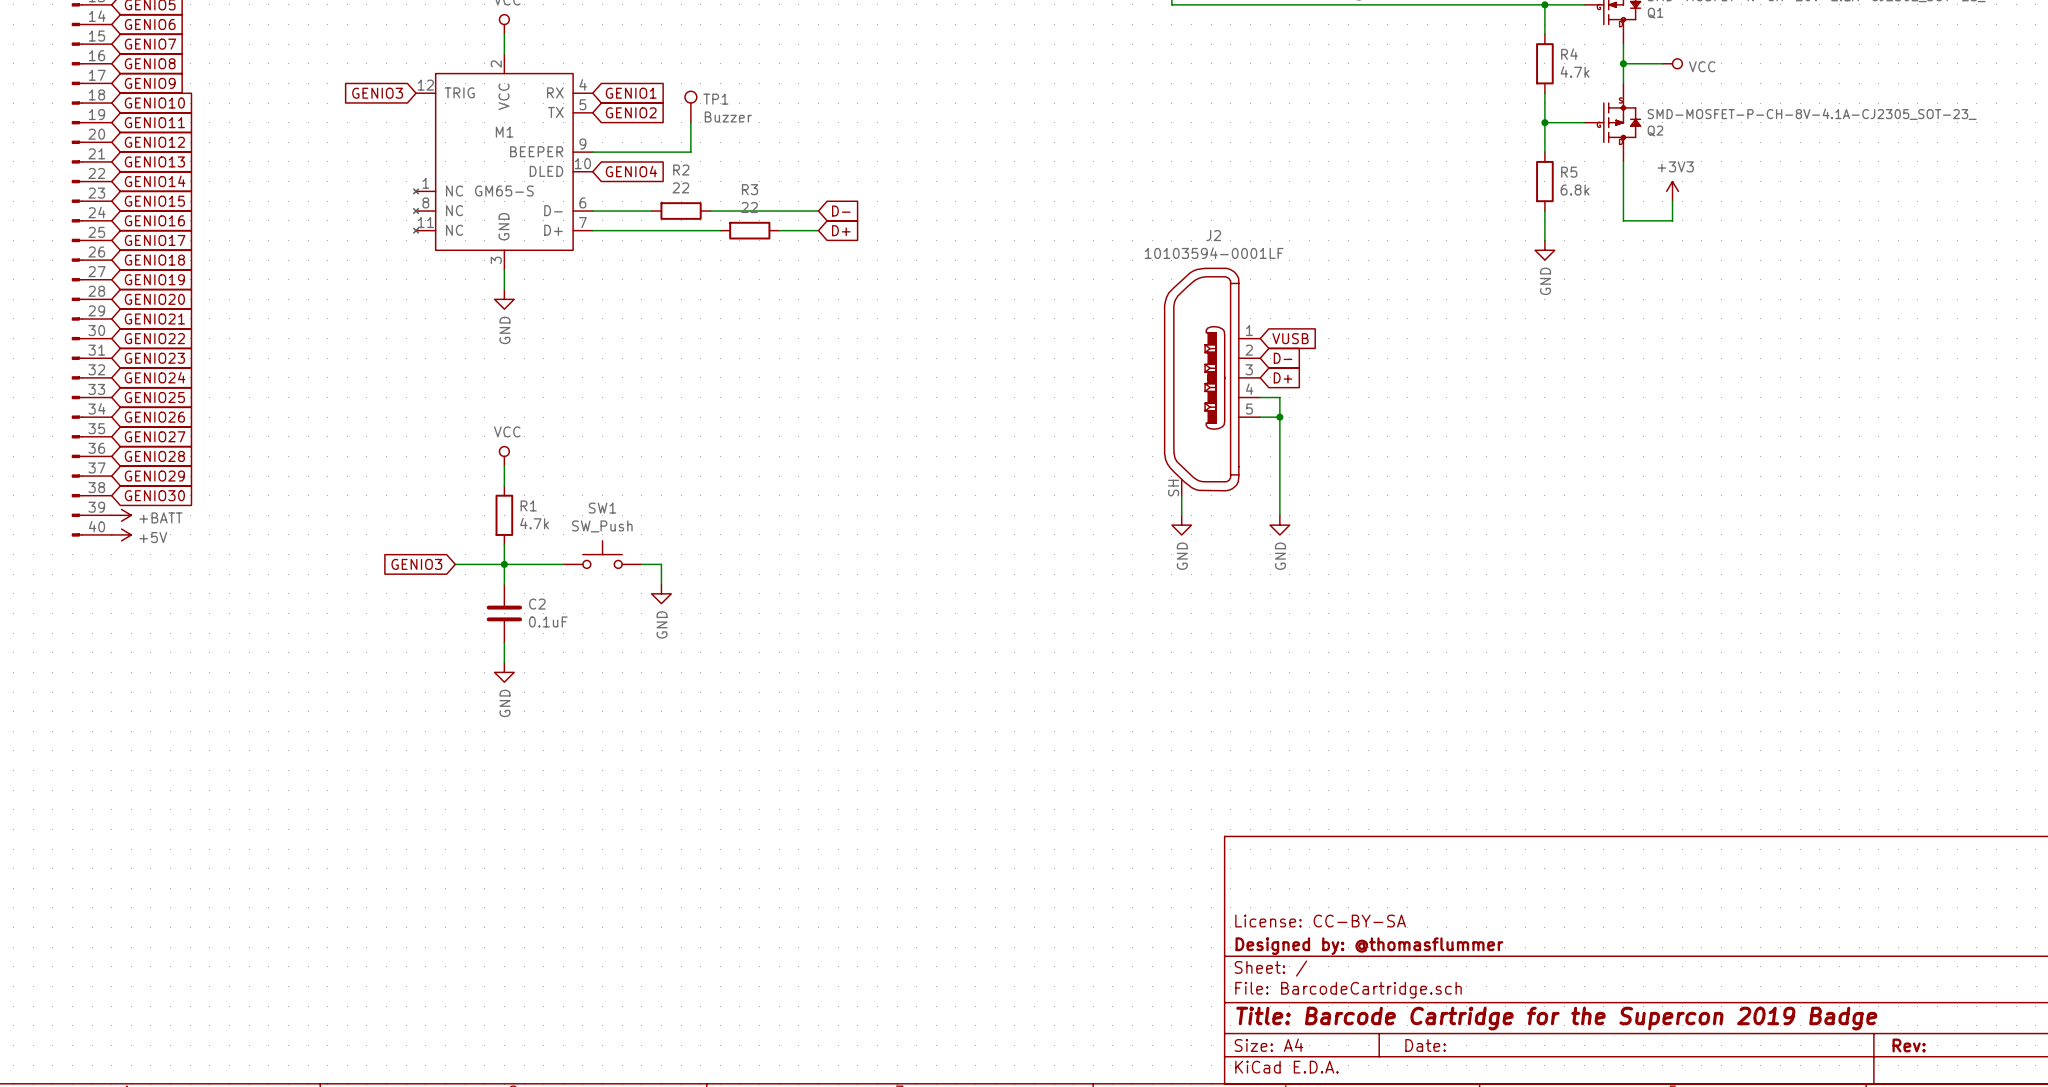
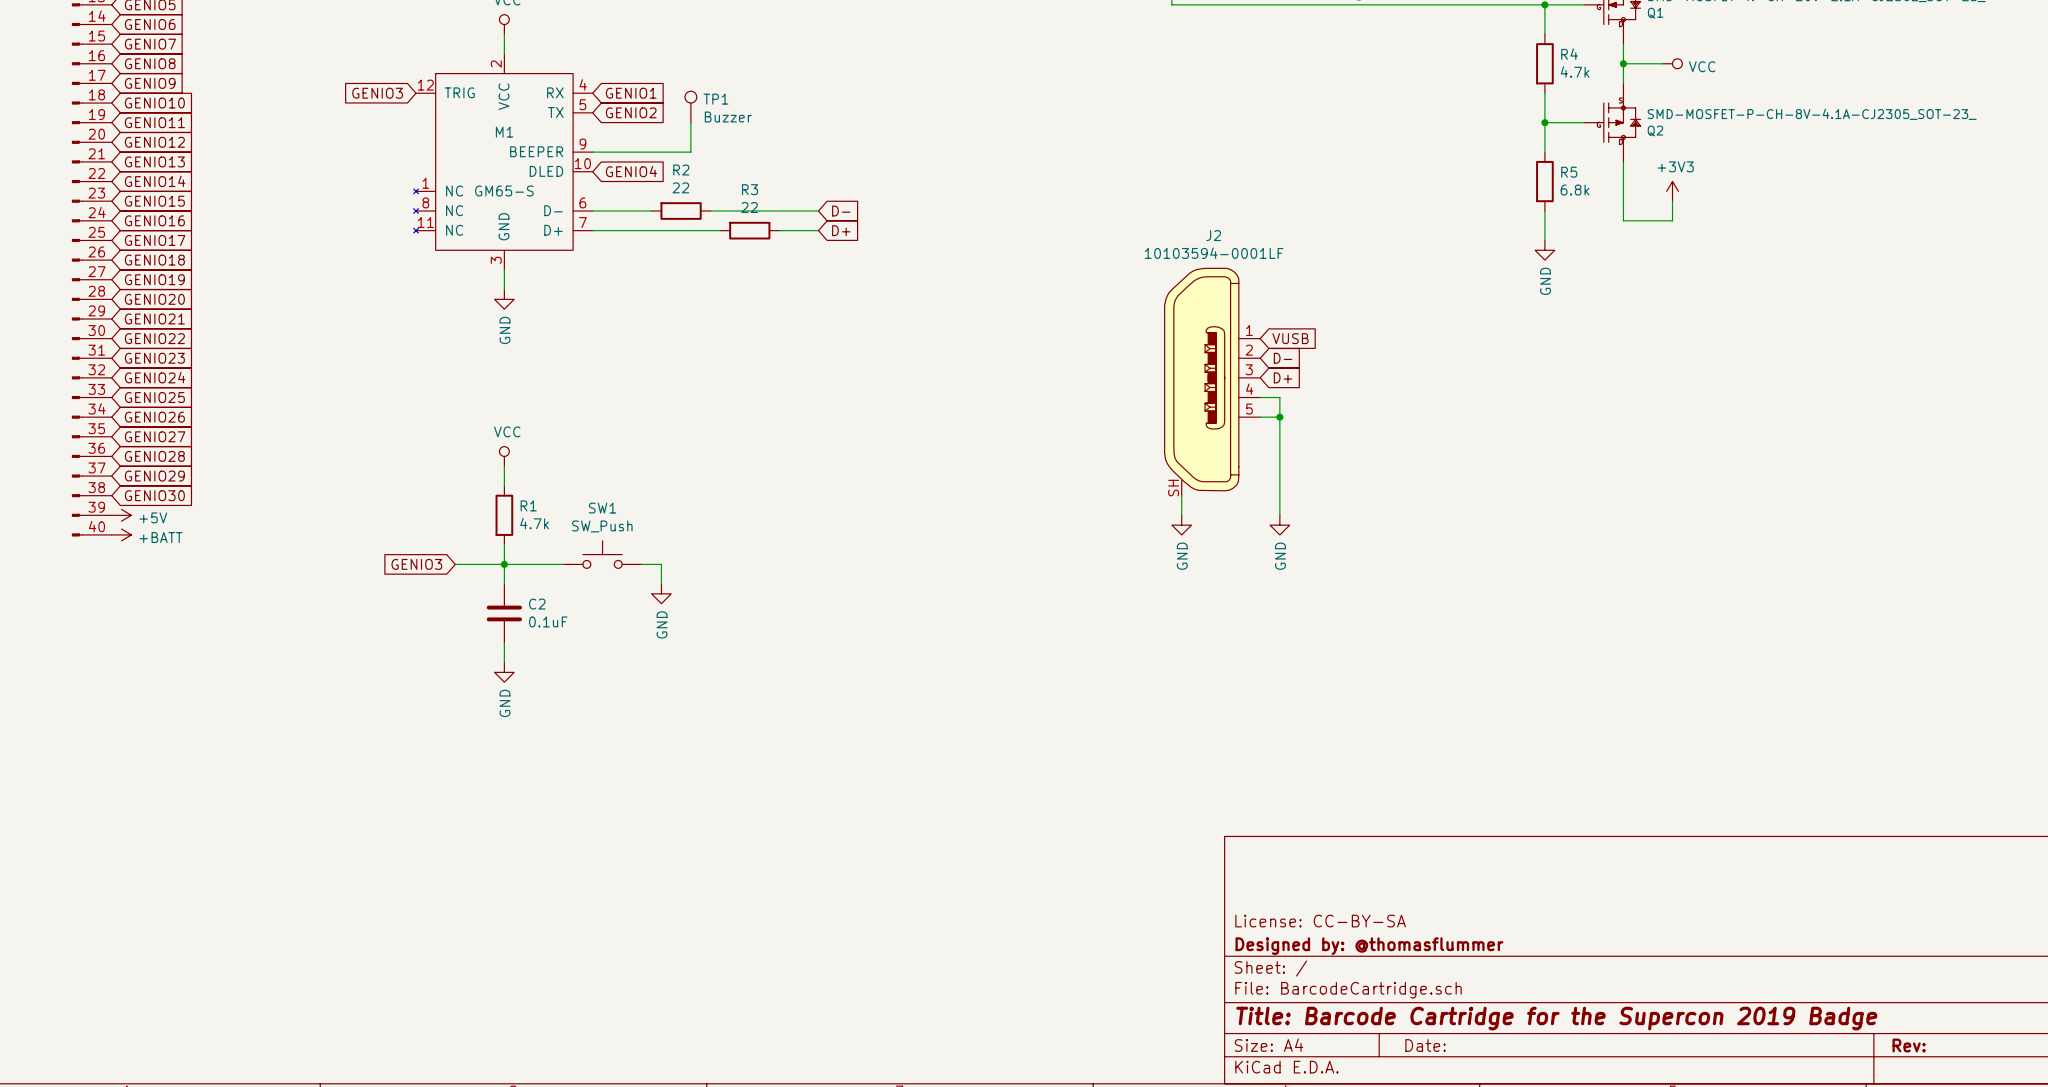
power symbol: +BATT (121, 515) -> +5V (121, 515)
power symbol: +5V (121, 534) -> +BATT (121, 534)

